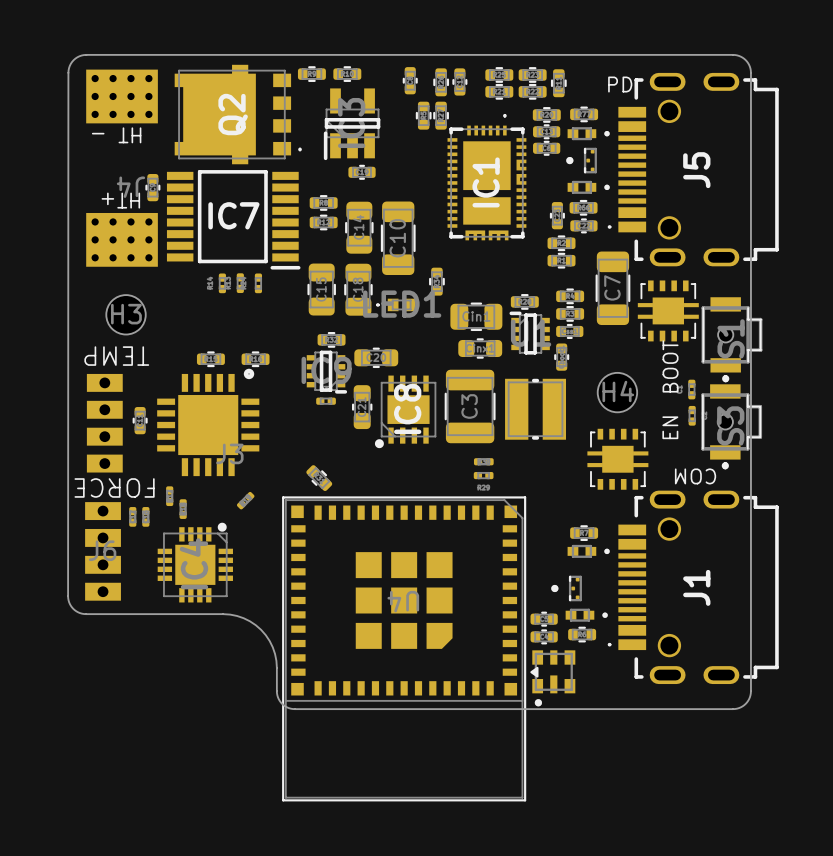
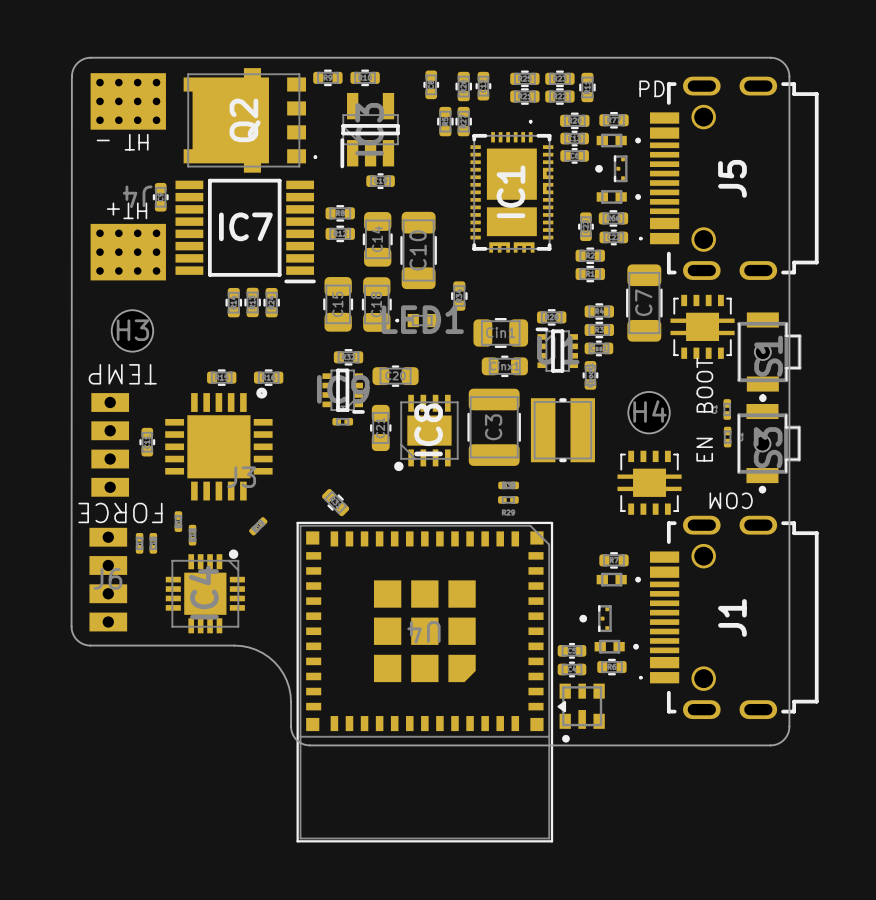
part footprint: [218, 273, 226, 294] -> [225, 287, 243, 318]
part footprint: [236, 273, 244, 294] -> [244, 287, 261, 318]
part footprint: [254, 273, 263, 294] -> [263, 287, 280, 318]

